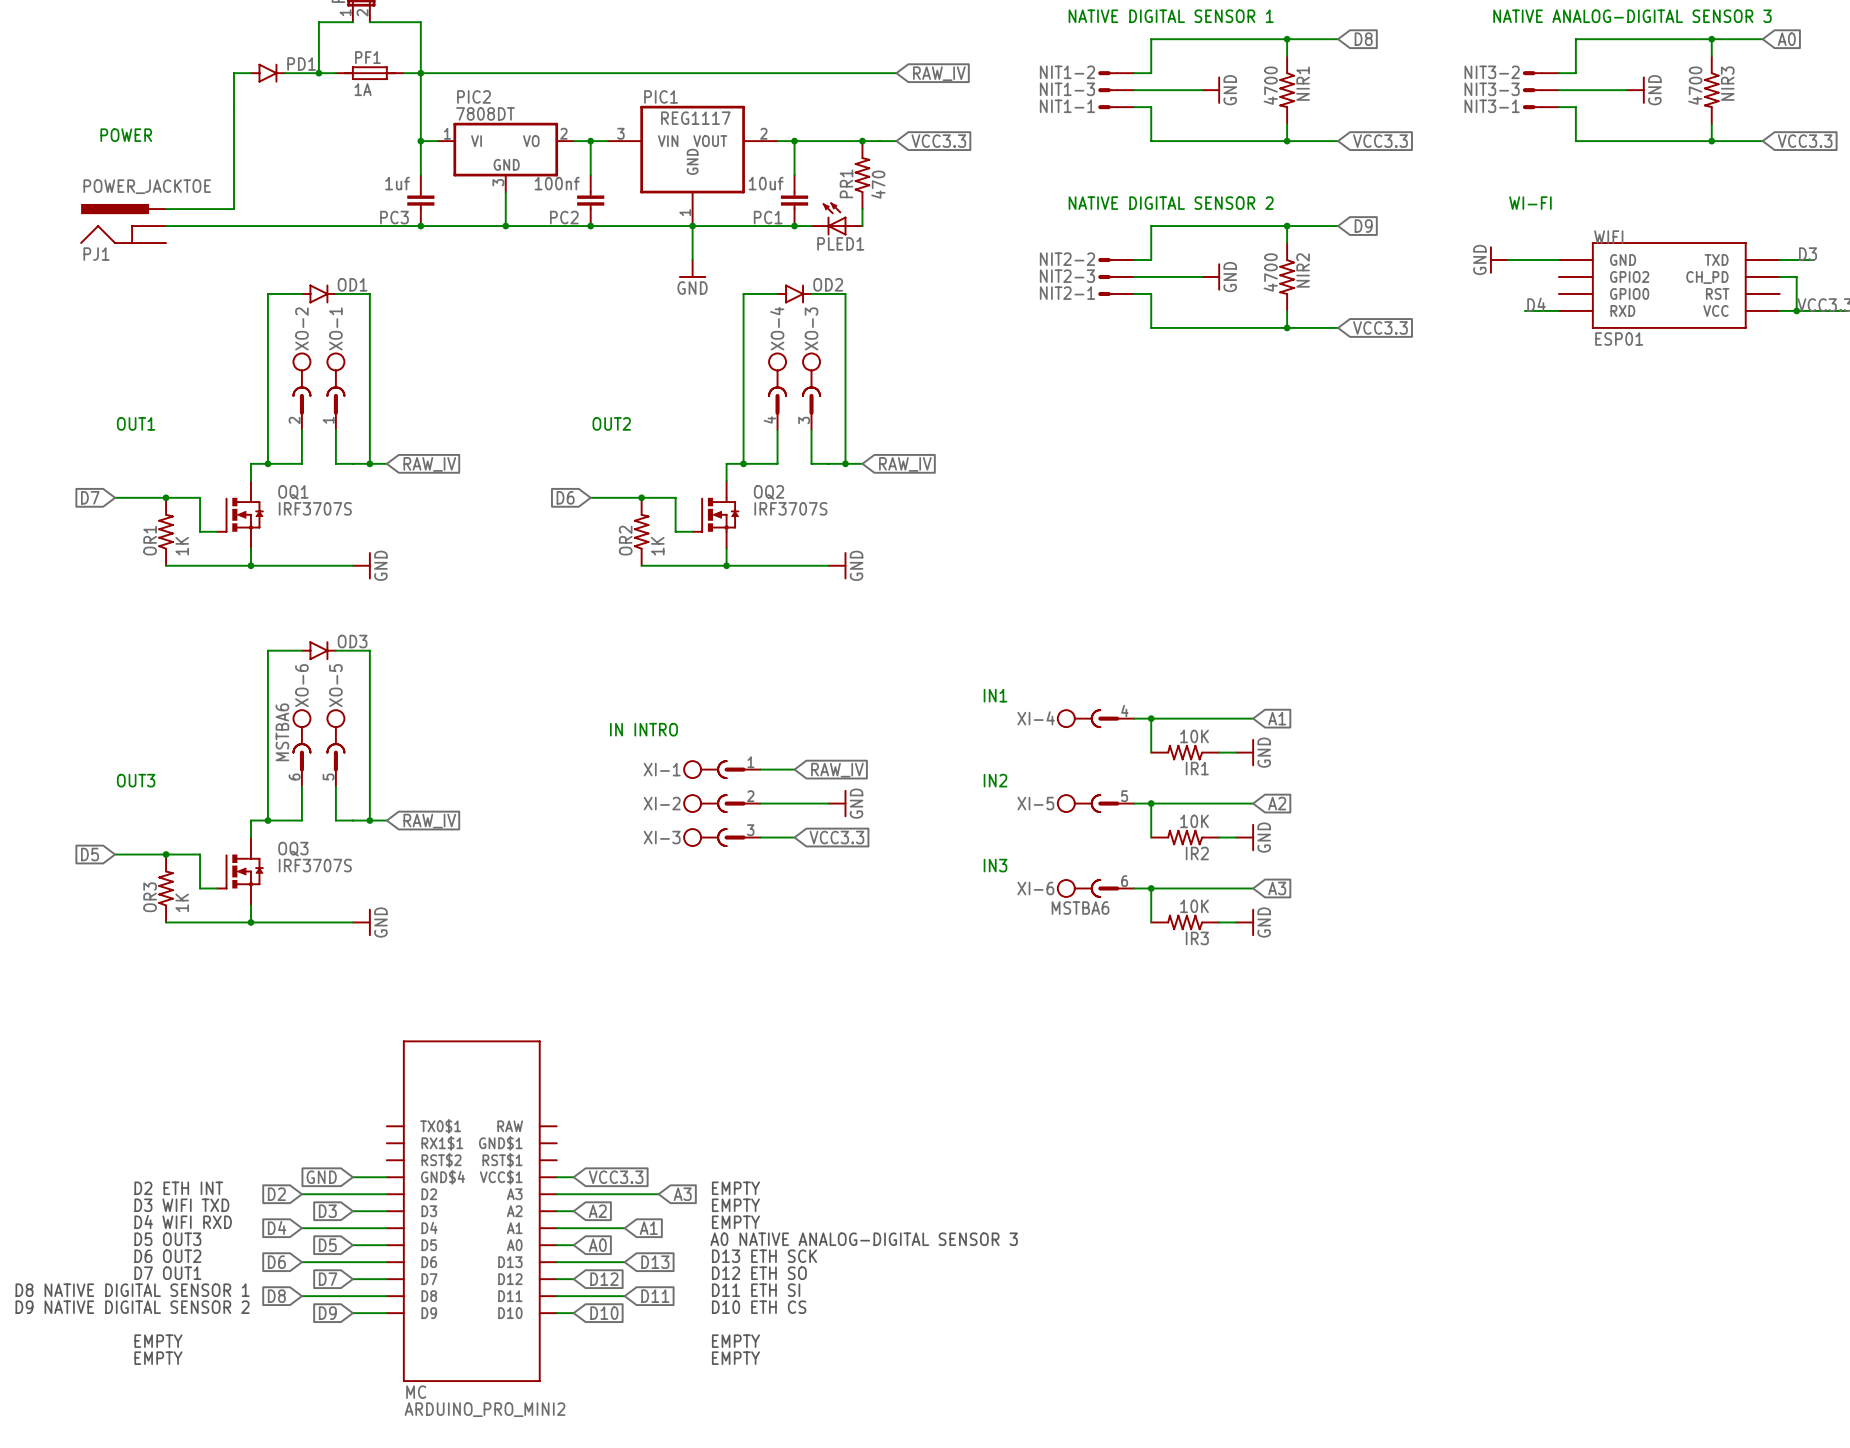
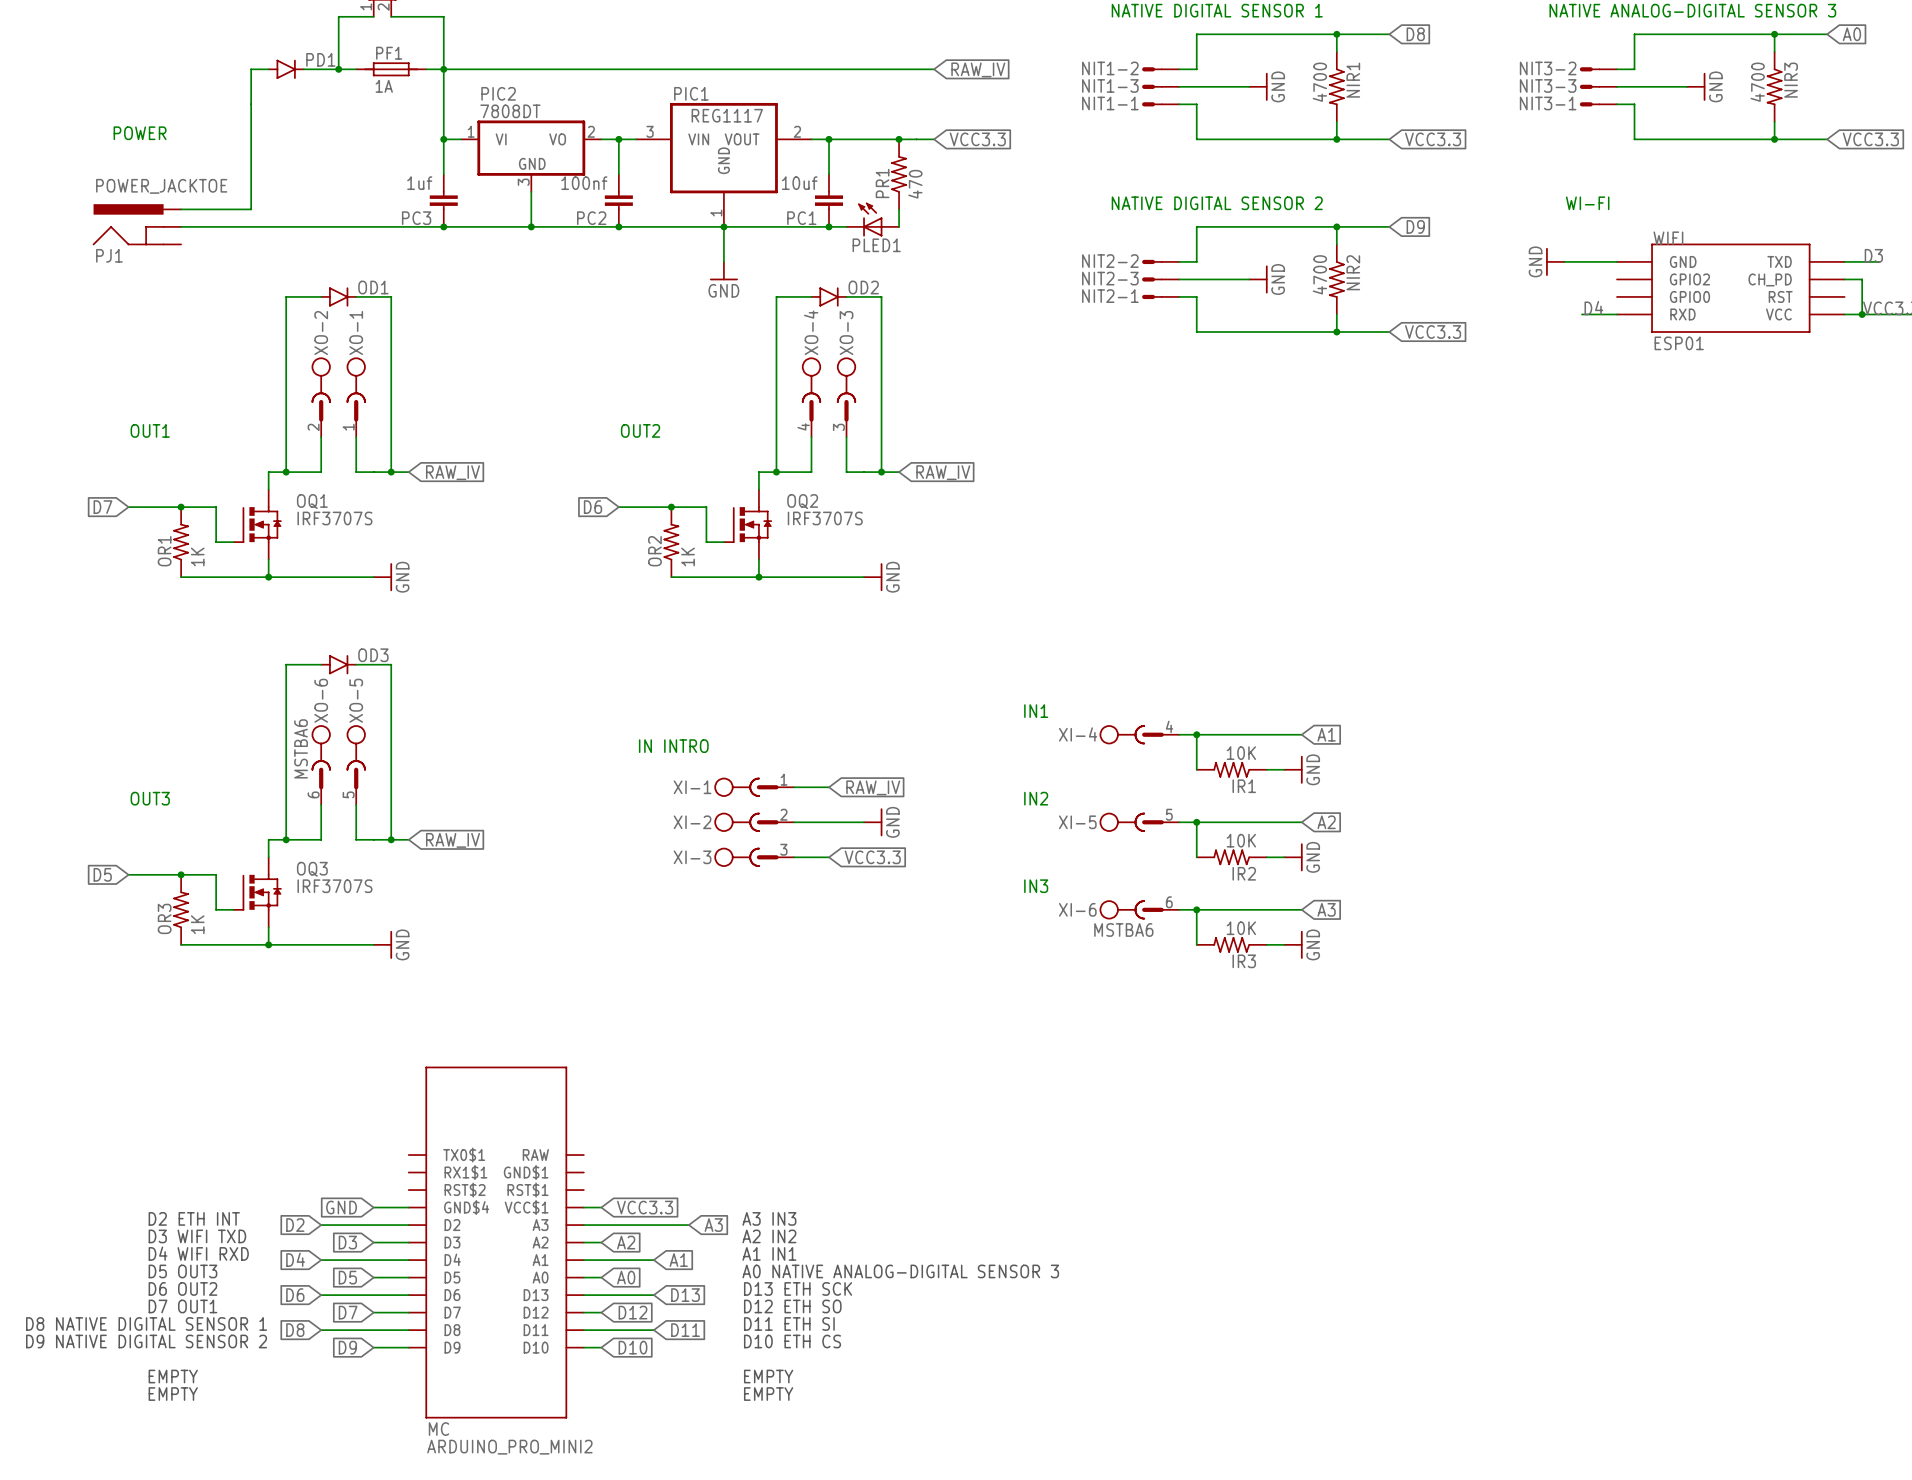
text: EMPTY (735, 1188) -> A3 IN3 (769, 1218)
text: EMPTY (735, 1205) -> A2 IN2 (769, 1236)
text: EMPTY (735, 1222) -> A1 IN1 (769, 1253)

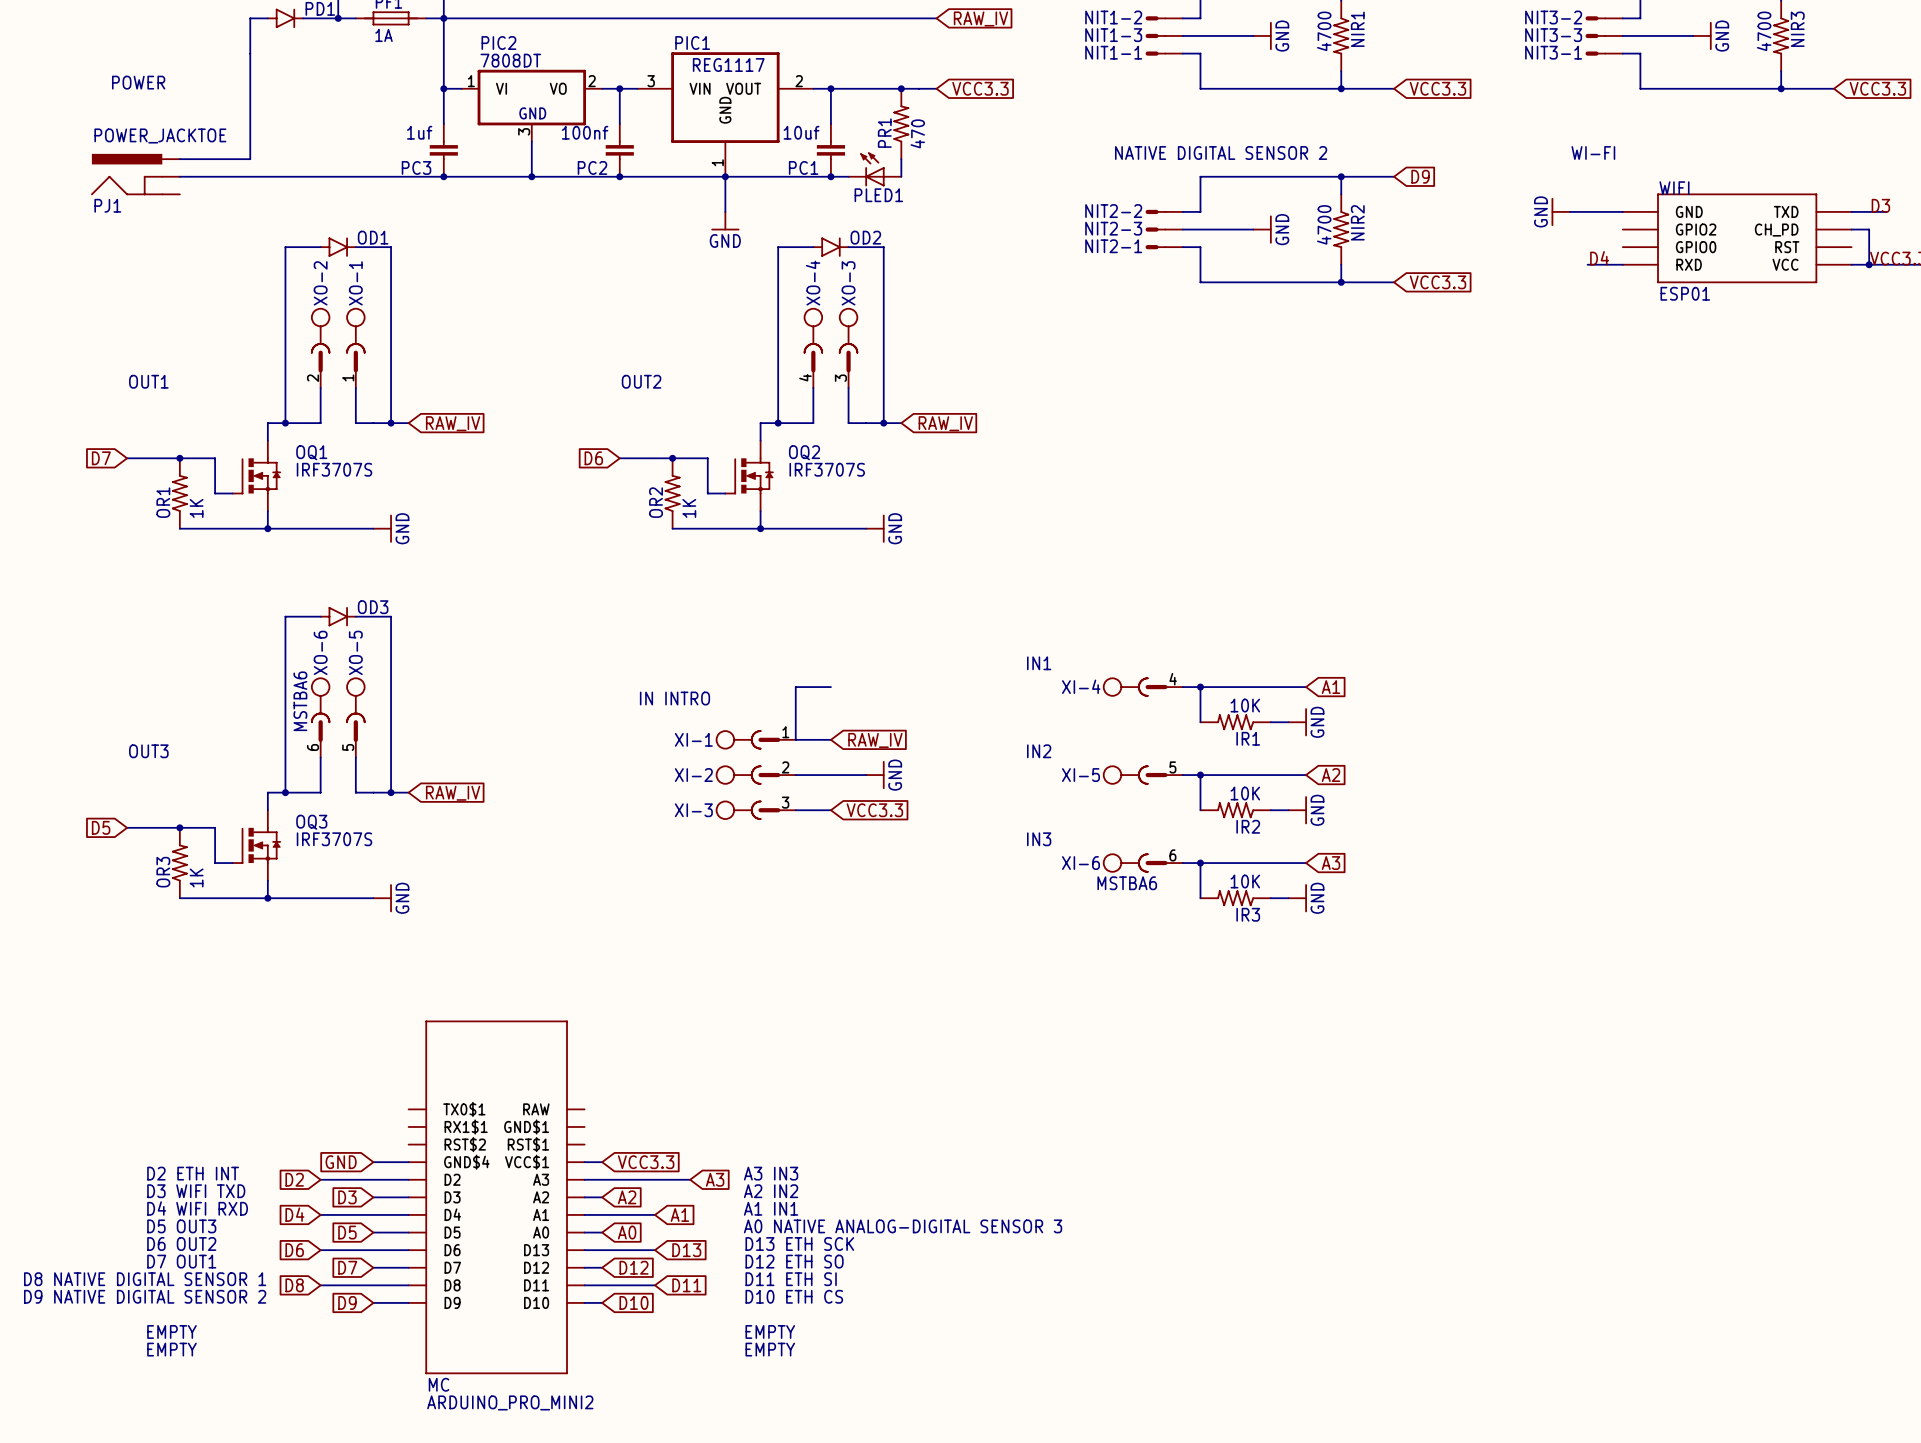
wire: none -> (830, 687) (795, 687) (795, 739)

